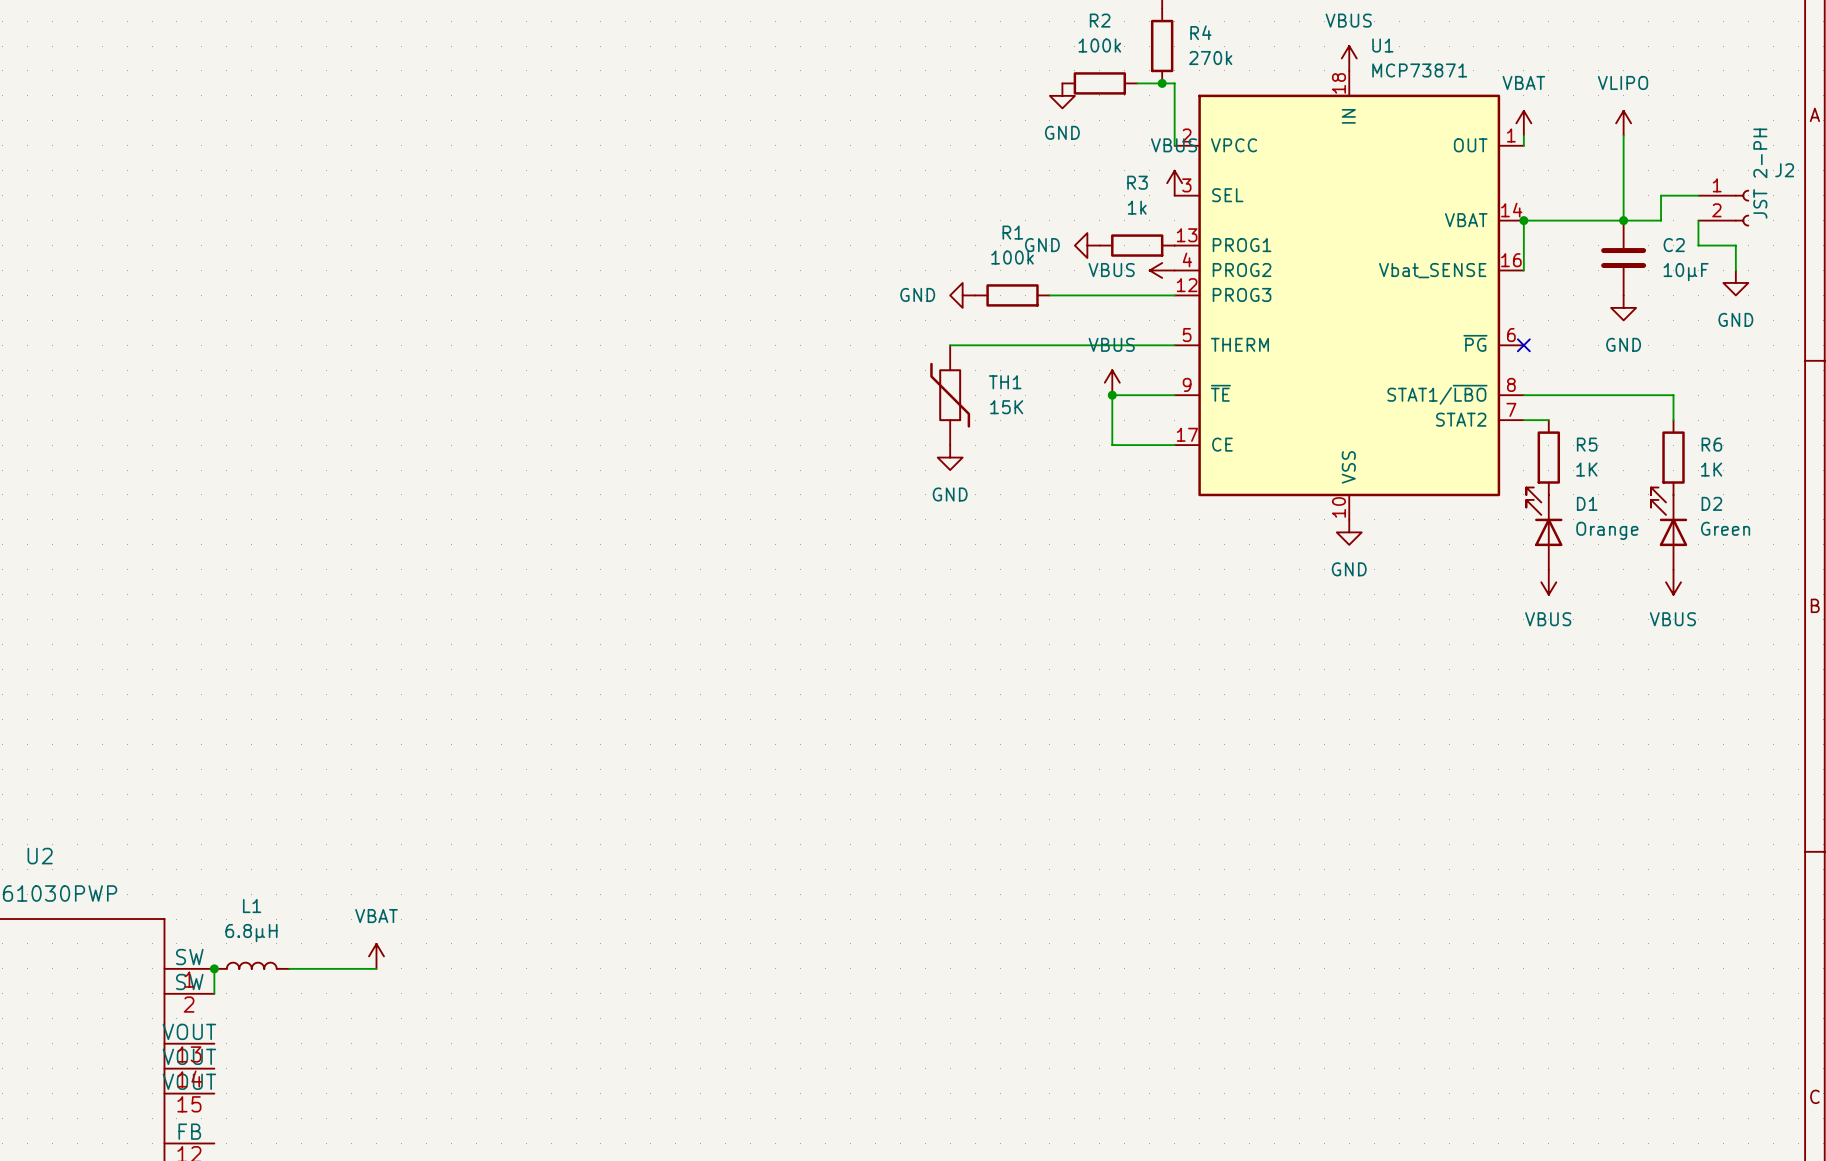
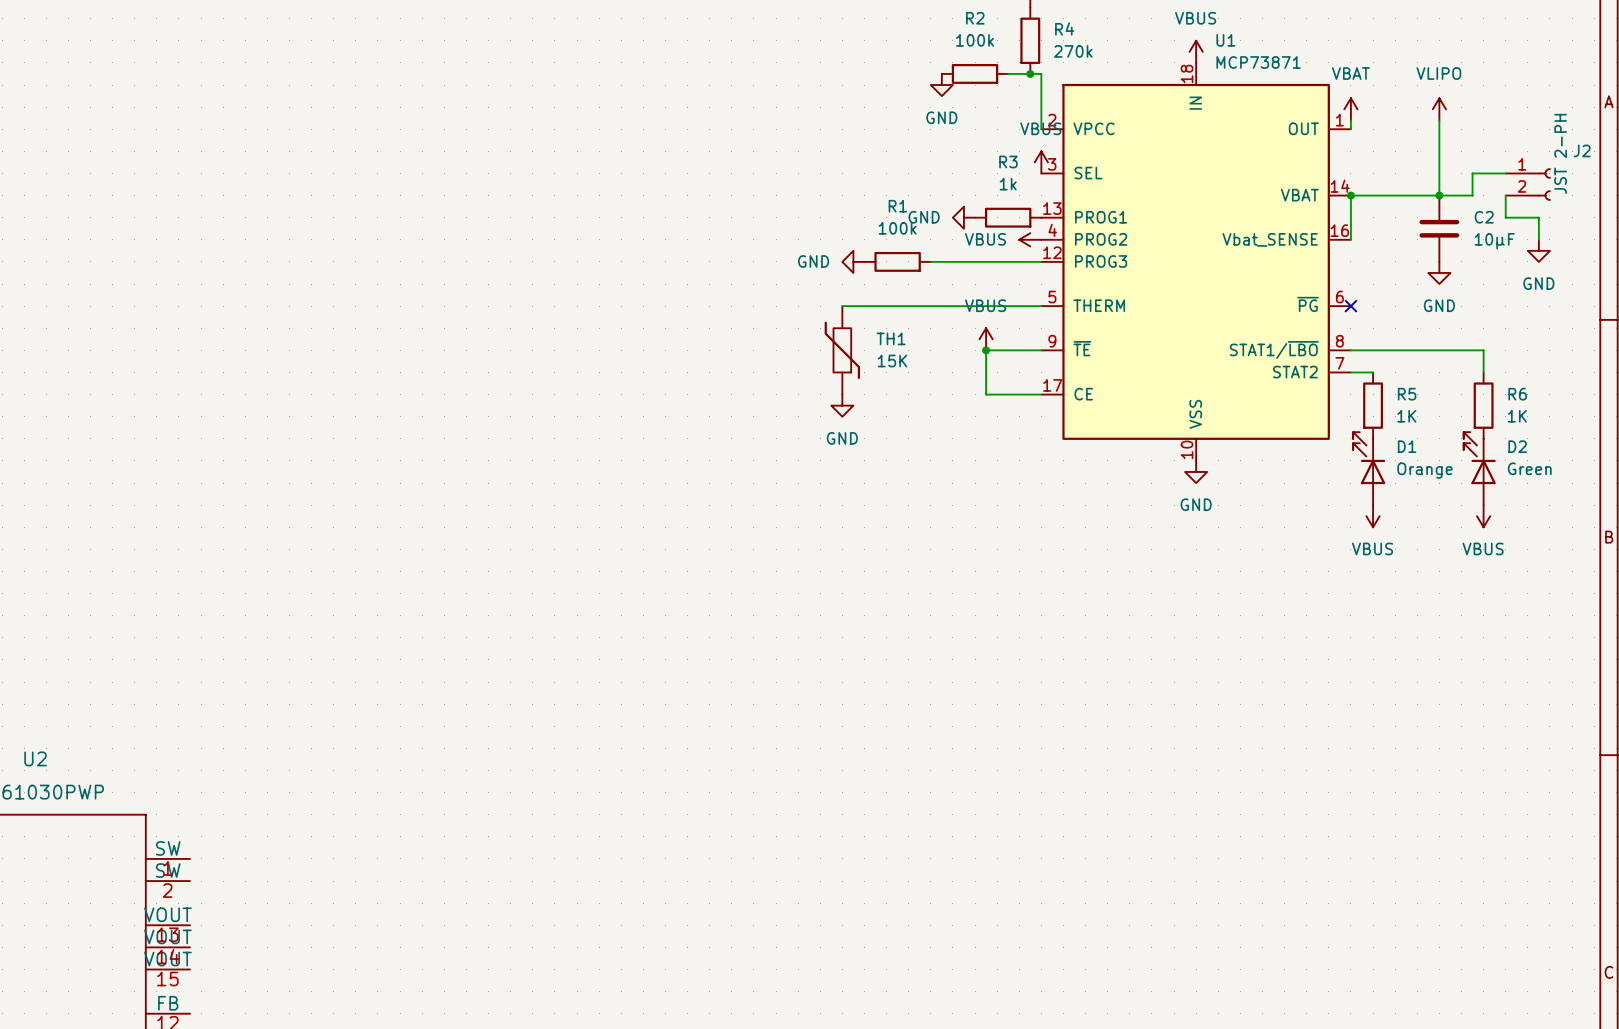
power symbol: VBAT (376, 956) -> none
L1: 6.8μH (251, 965) -> none
wire: (214, 968) (214, 993) -> none
junction: (214, 968) -> none
wire: (289, 968) (376, 968) -> none

